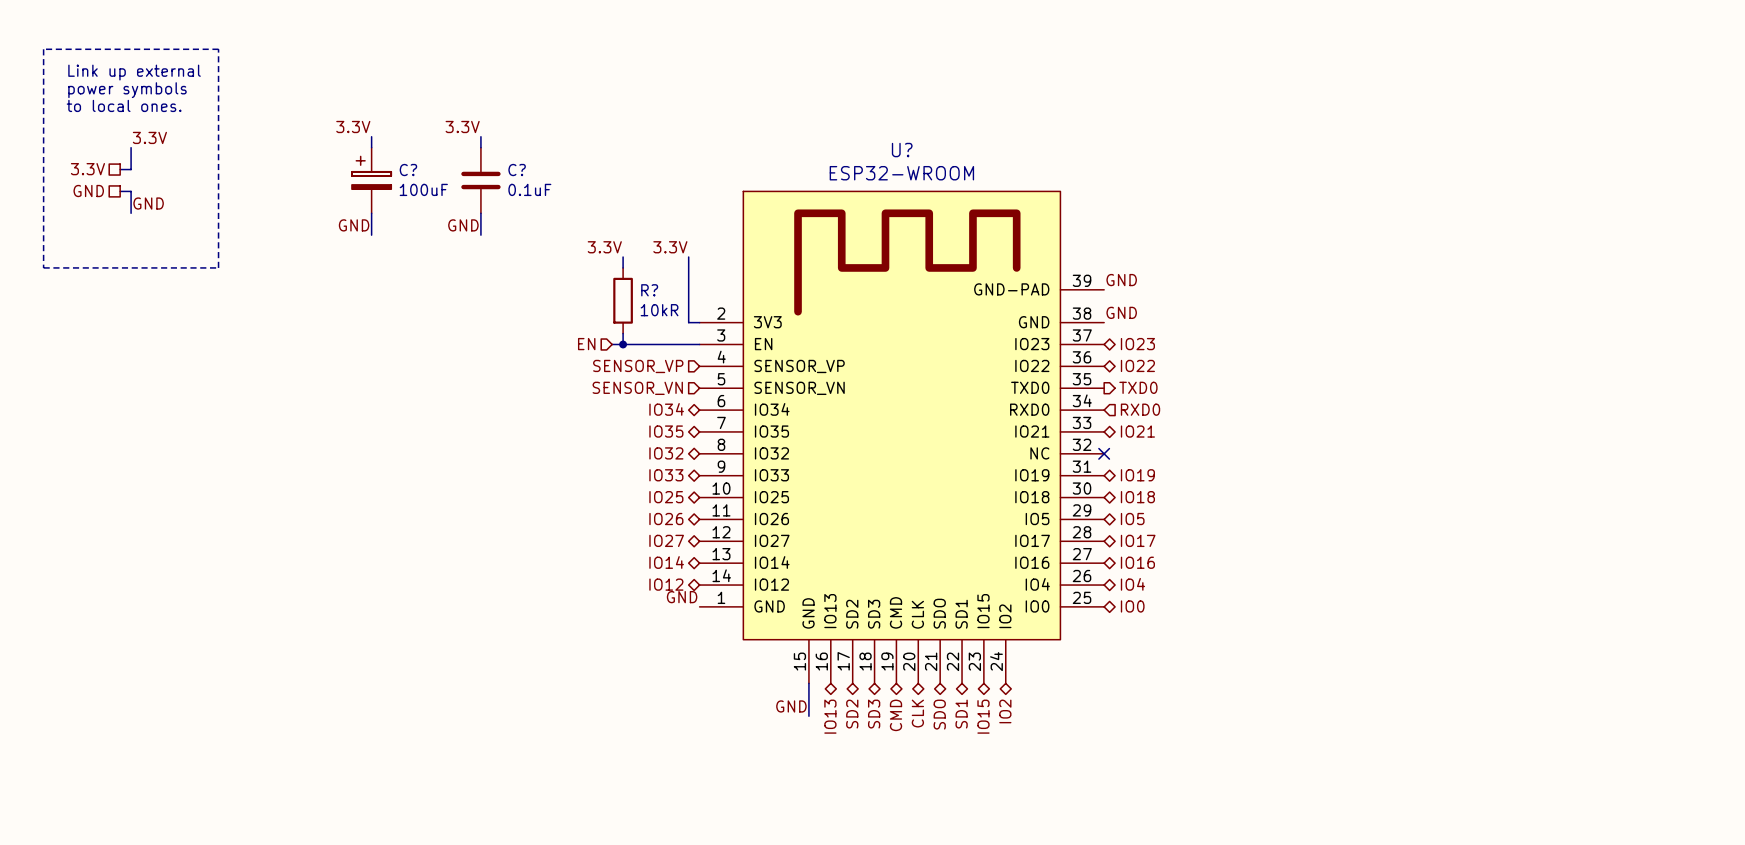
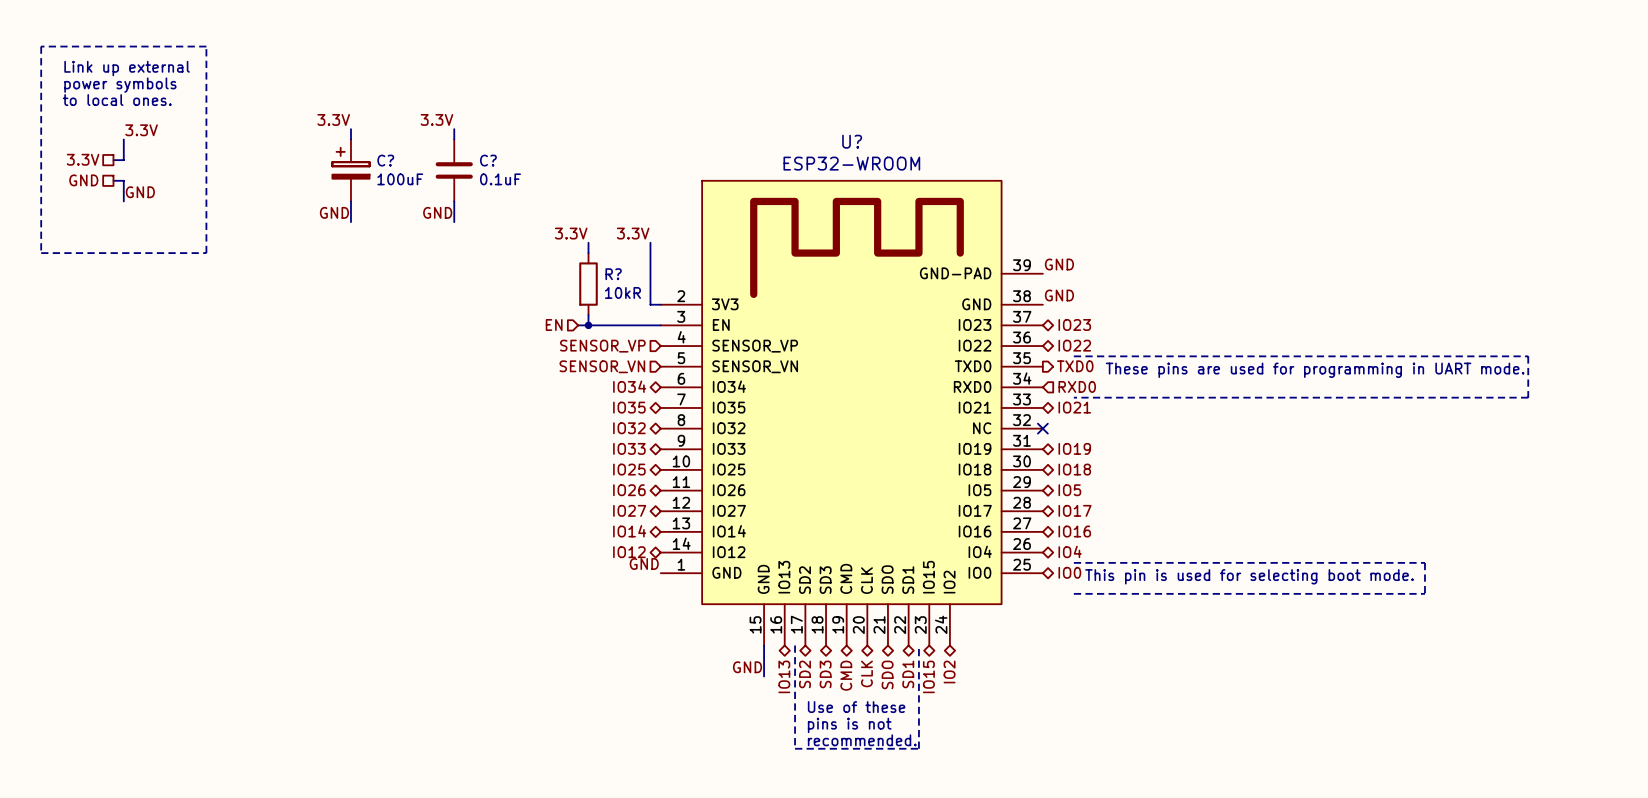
line: none -> (1073, 356) (1528, 356) (1528, 397) (1073, 397)
text: none -> These pins are used for programming in UART mode. (1315, 370)
line: none -> (1073, 562) (1424, 562) (1424, 593) (1073, 593)
text: none -> This pin is used for selecting boot mode. (1249, 576)
line: none -> (795, 645) (795, 748) (918, 748) (918, 645)
text: none -> Use of these (856, 707)
text: none -> pins is not (849, 725)
text: none -> recommended. (862, 740)

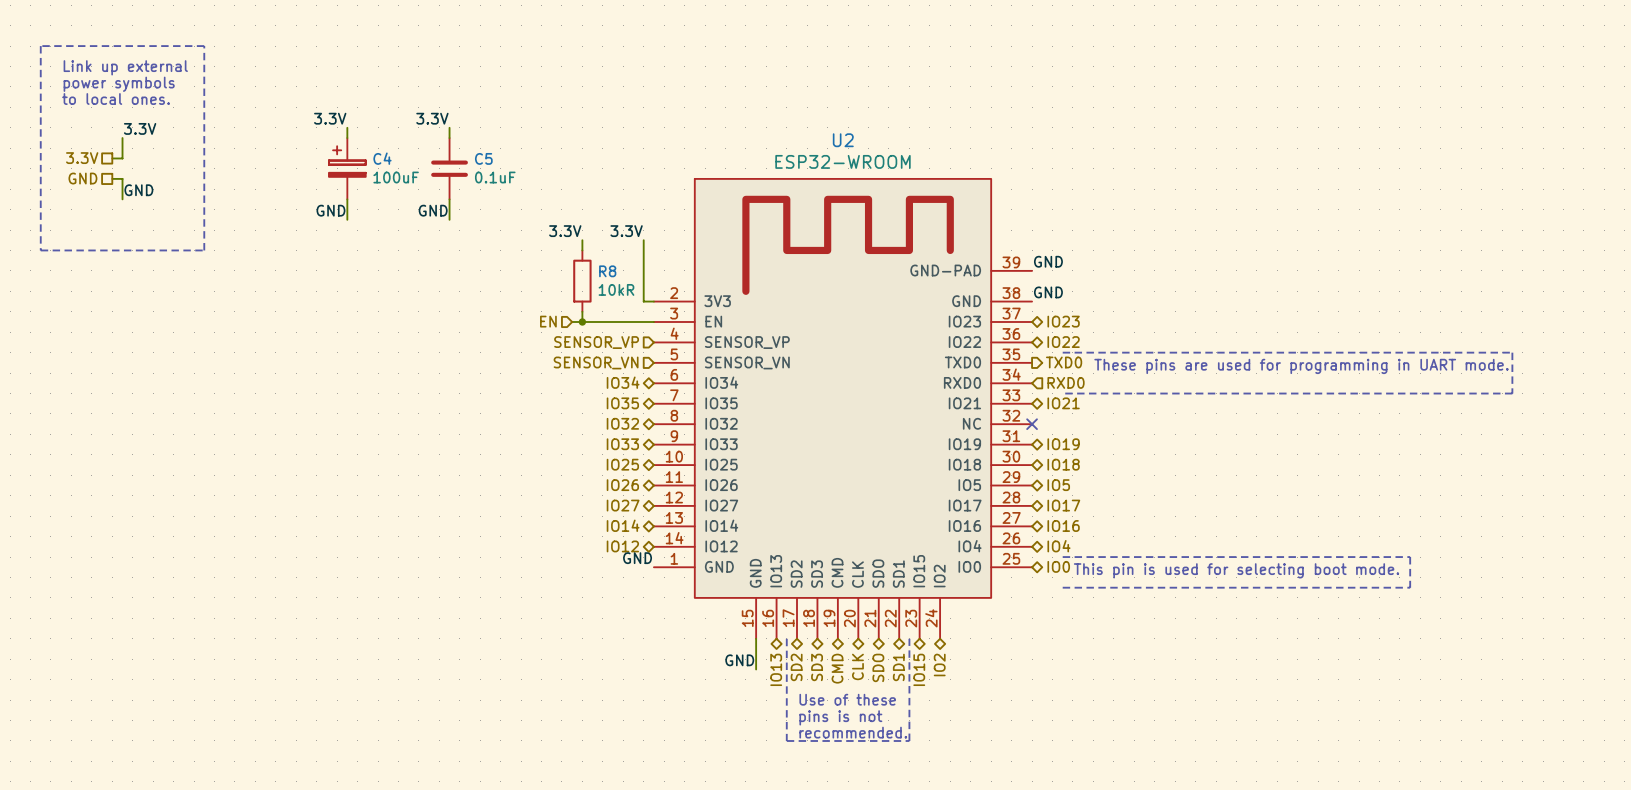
U? name: U? (852, 141) -> U2 (843, 140)
C? name: C? (385, 160) -> C4 (382, 158)
C? name: C? (488, 160) -> C5 (483, 158)
R? name: R? (613, 274) -> R8 (607, 271)

